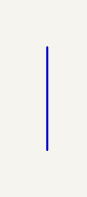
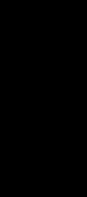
line: (47, 47) (47, 150) -> none

